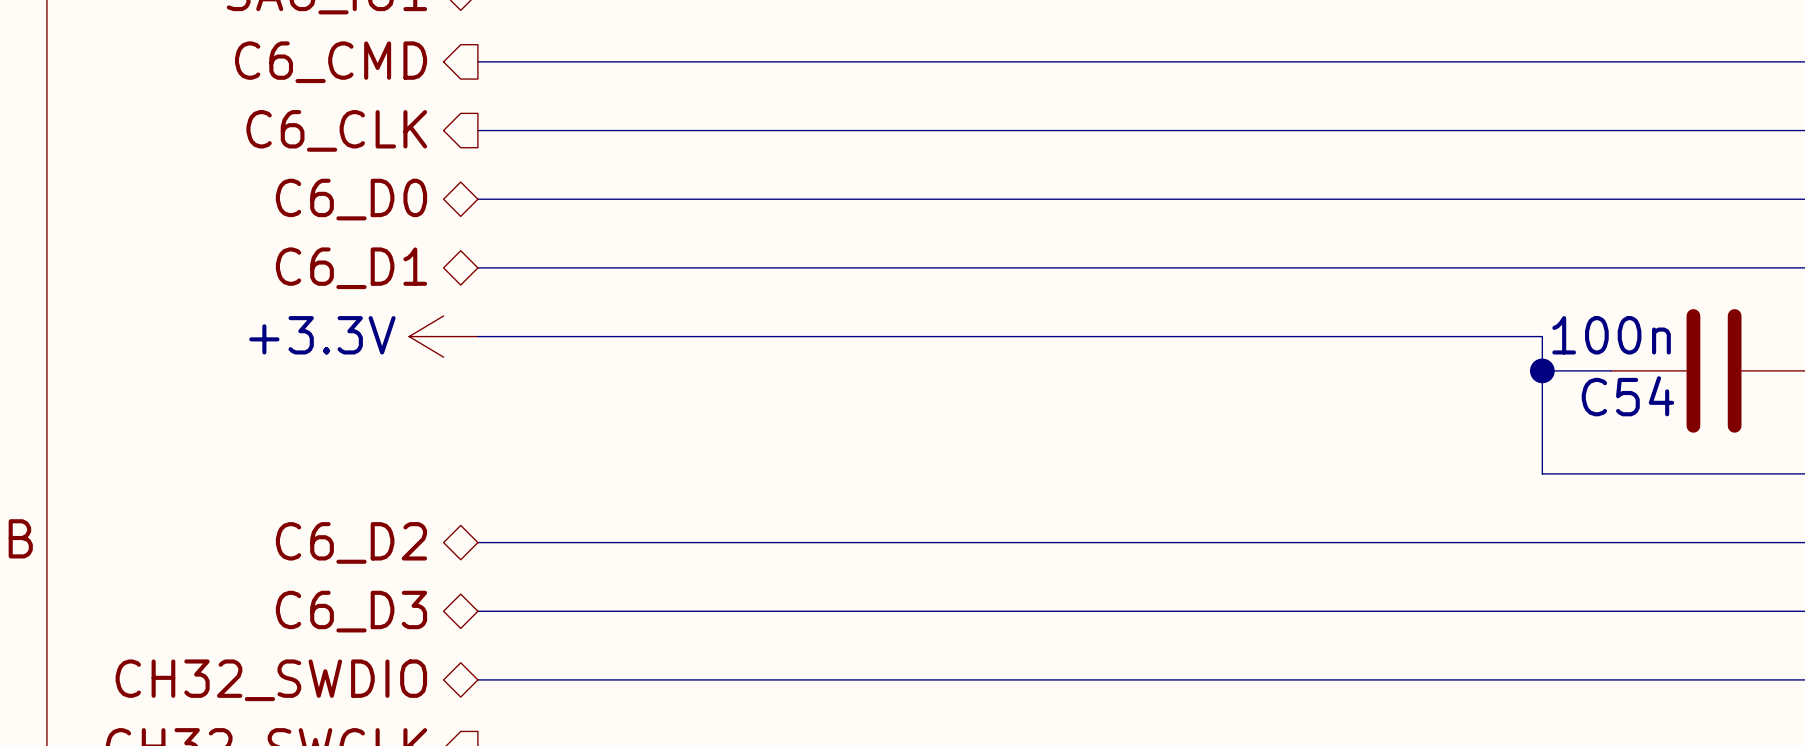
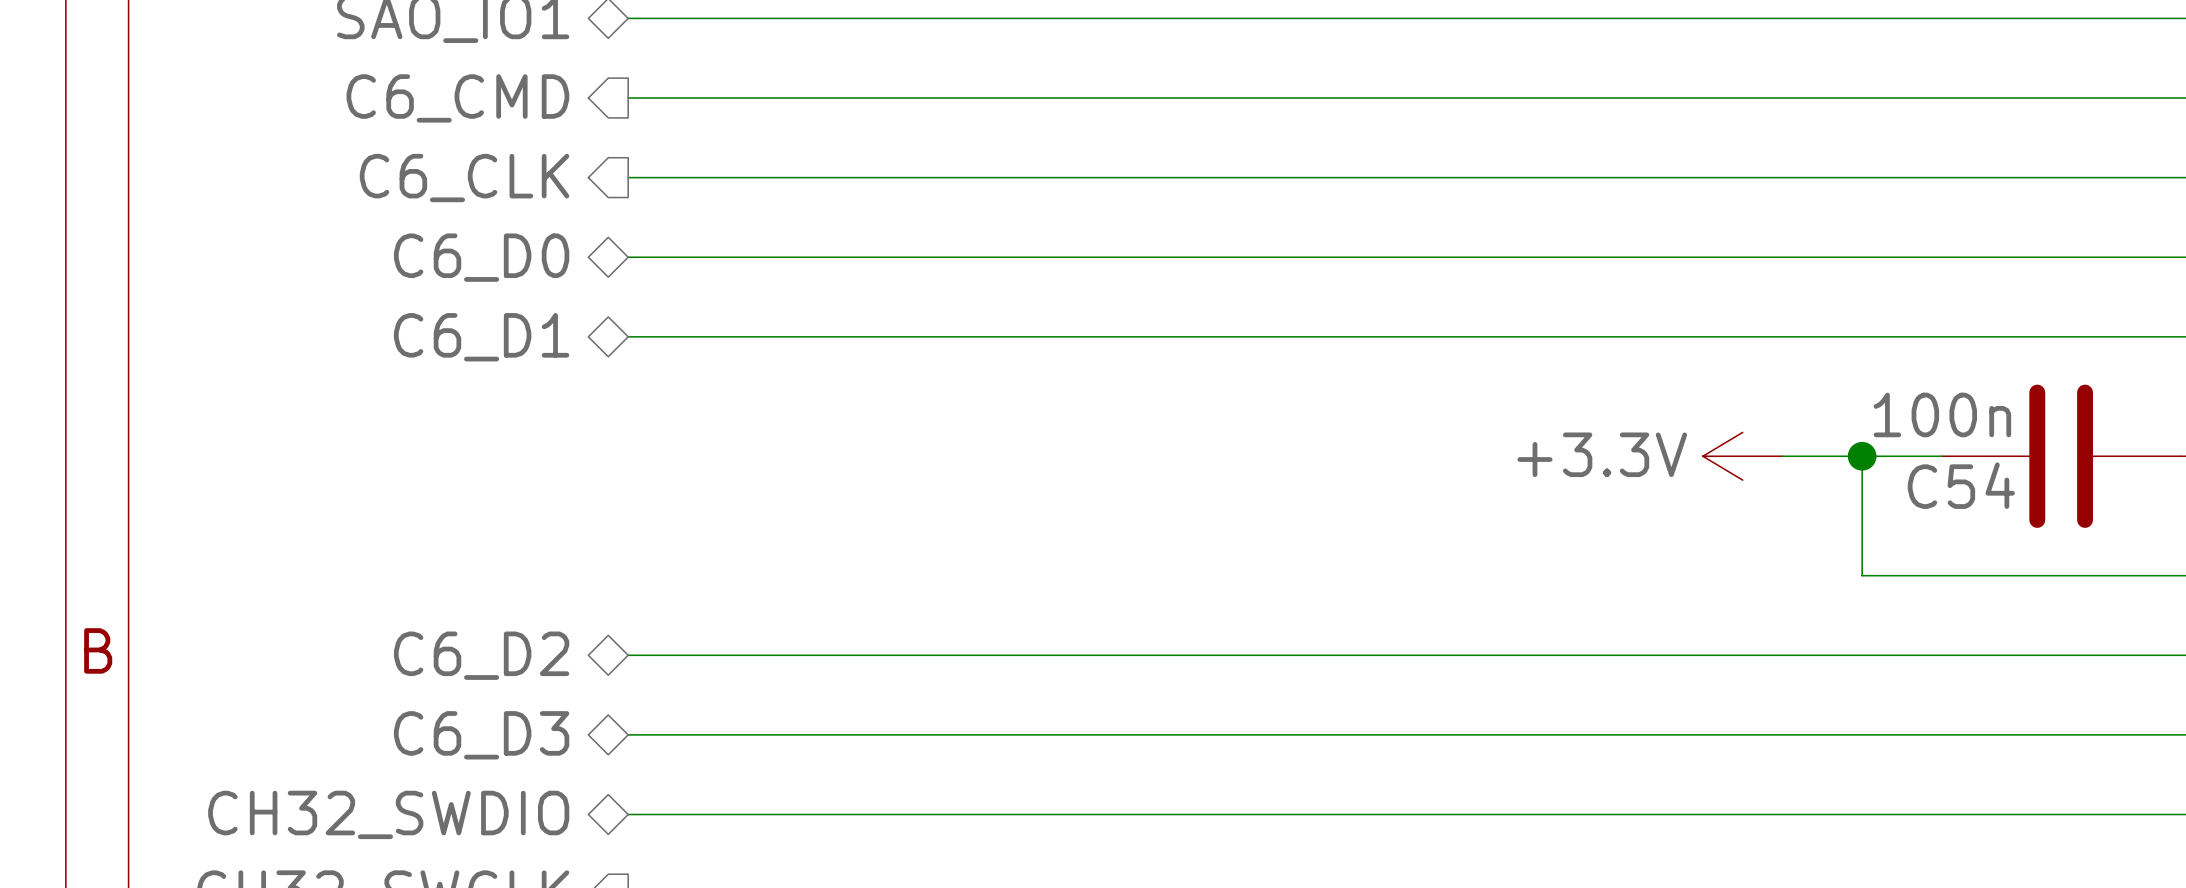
power symbol: +3.3V (443, 336) -> none
wire: (477, 336) (1542, 336) (1542, 370) -> (1782, 456) (1862, 456)
power symbol: none -> +3.3V (1742, 456)

